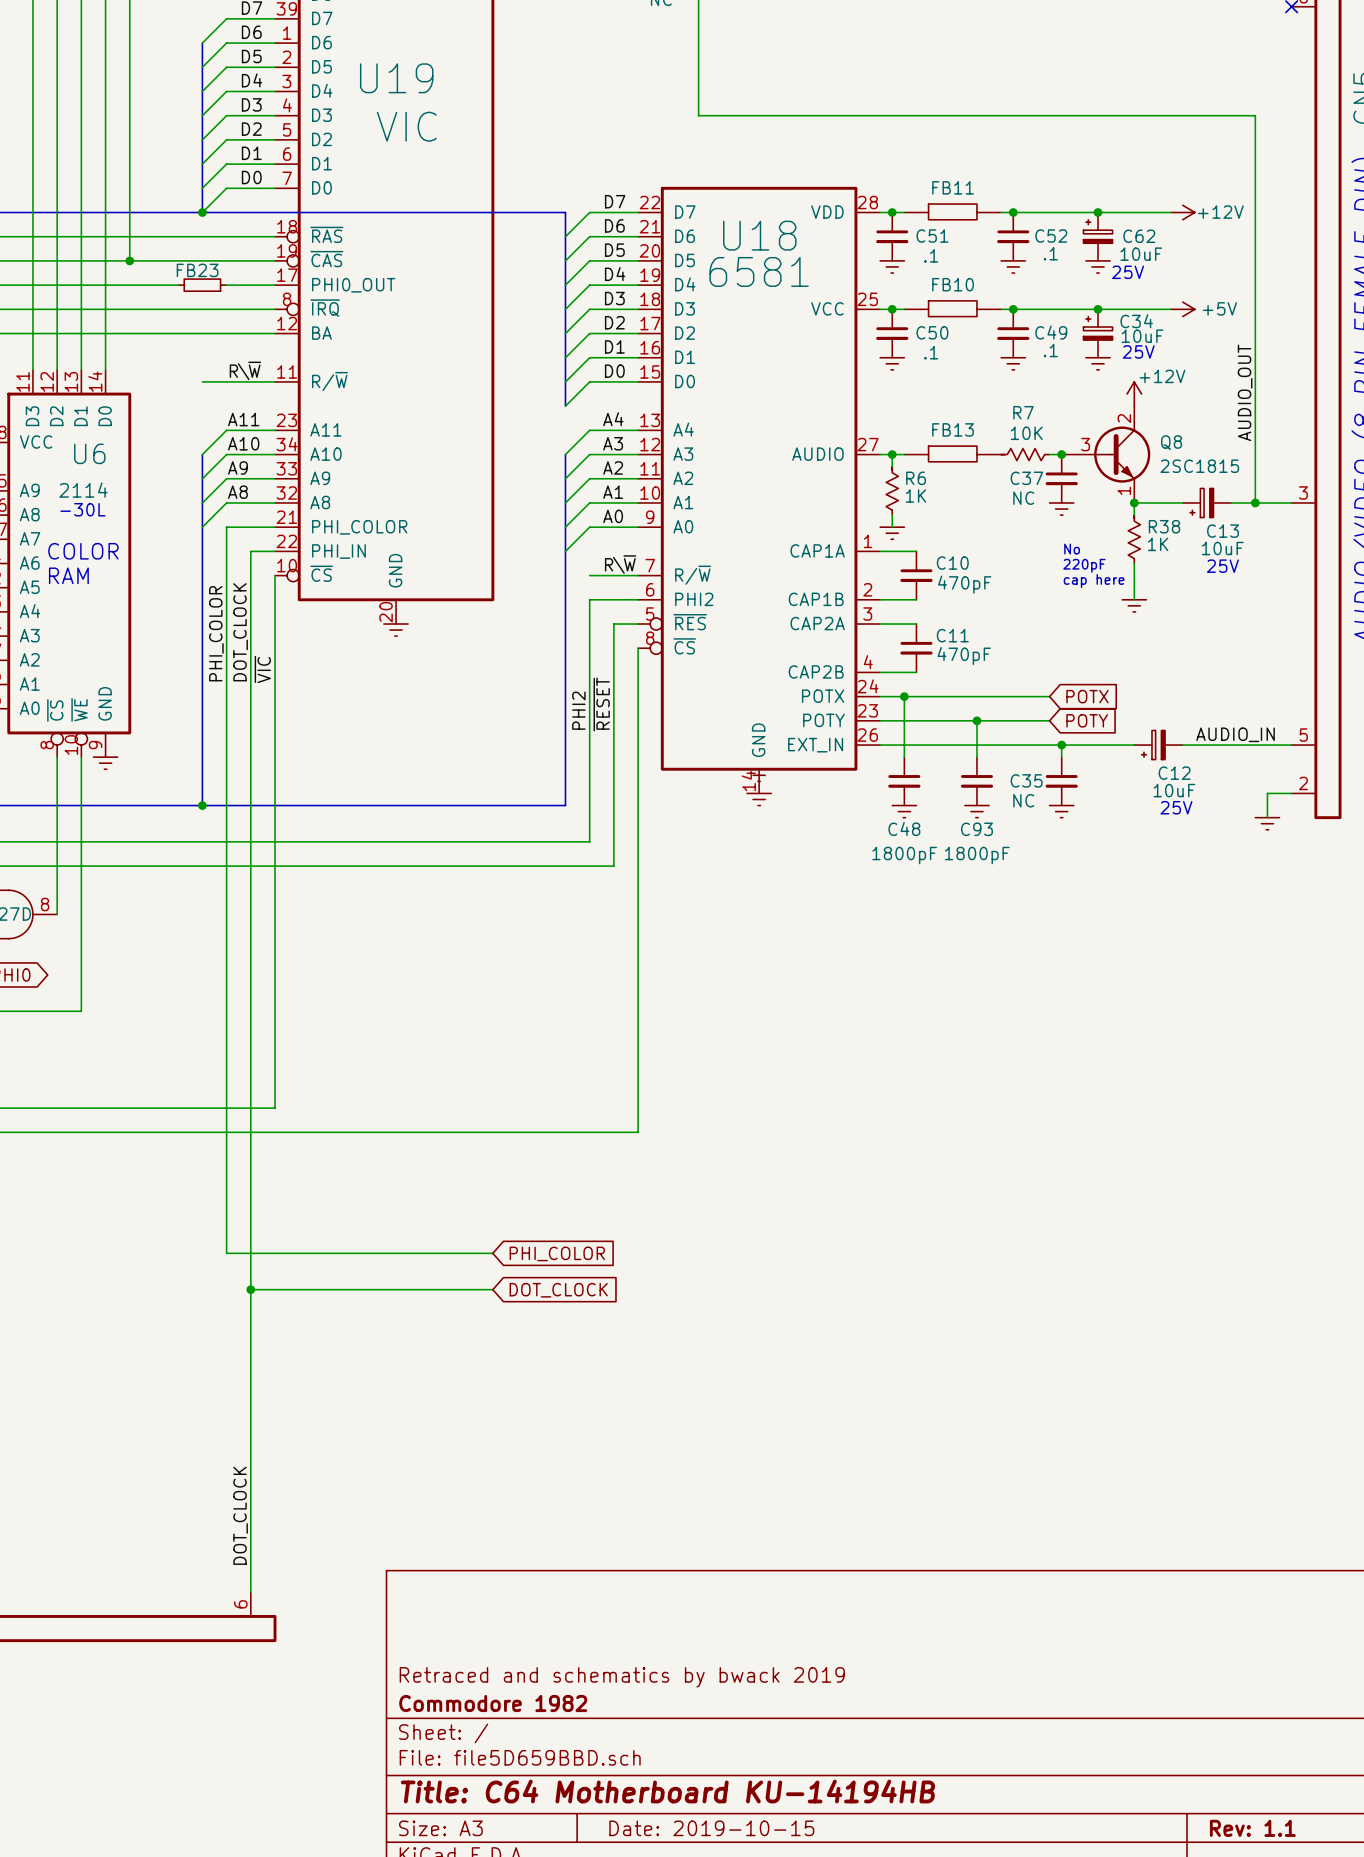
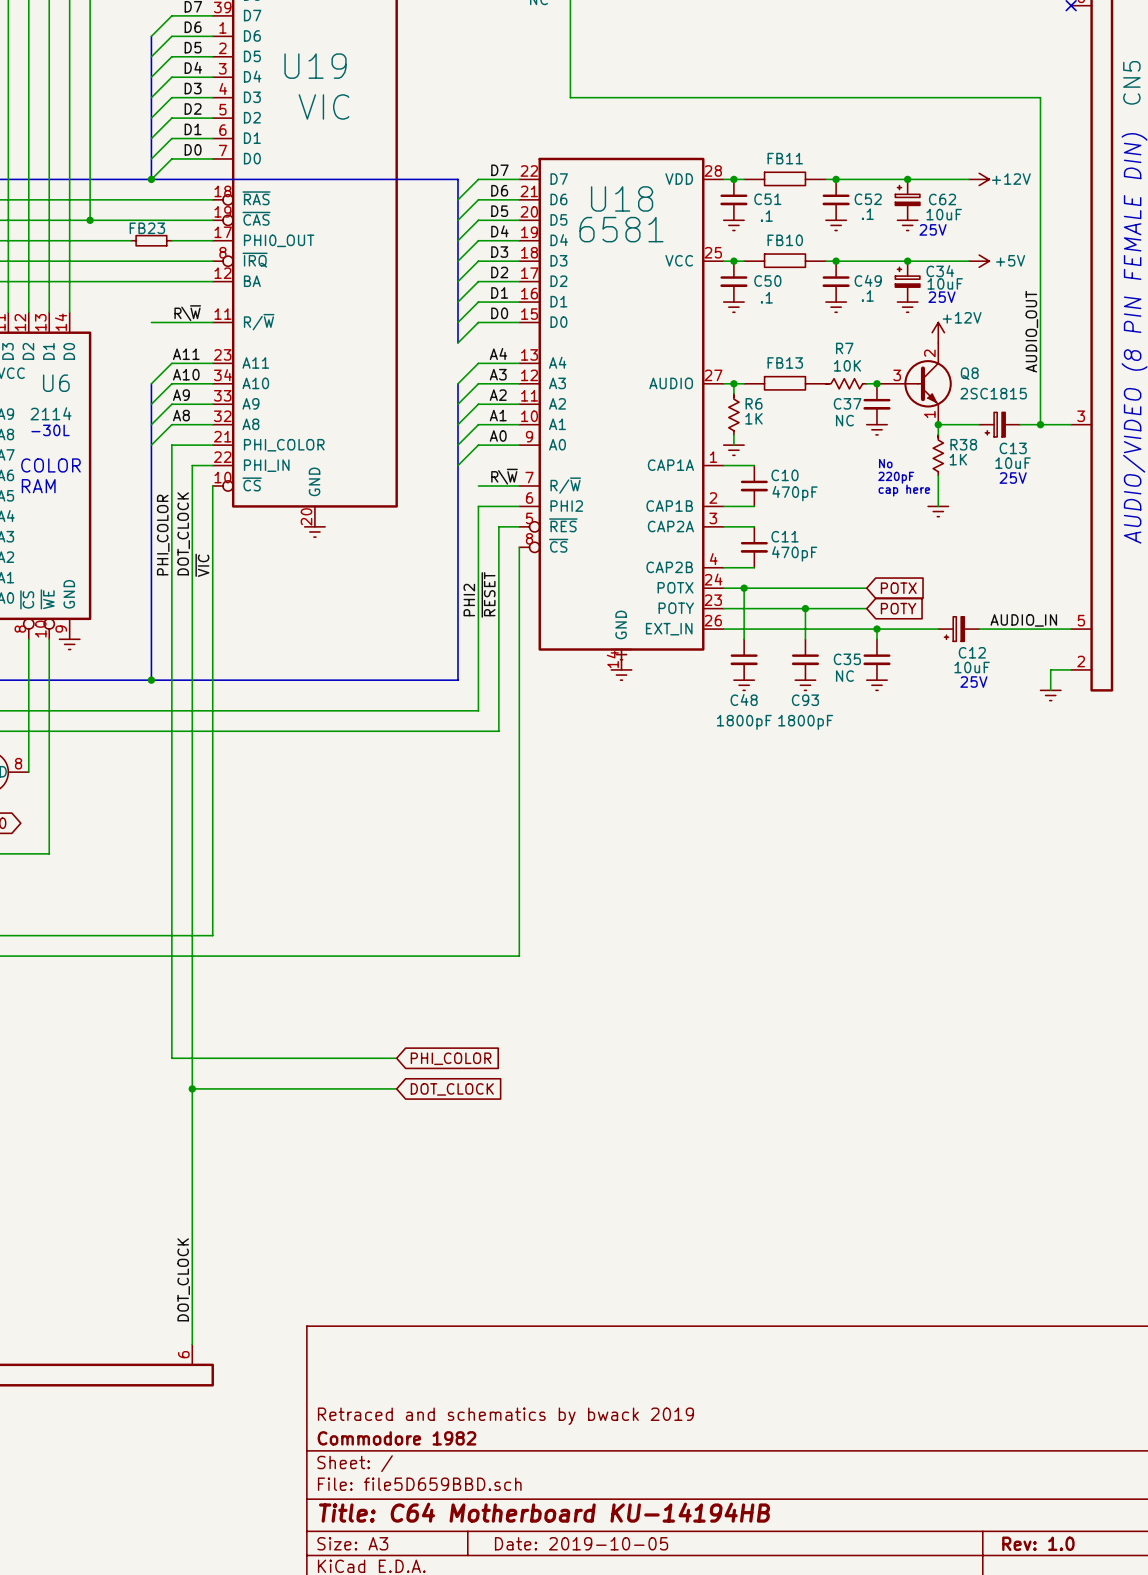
title block: Date: 2019-10-15 (711, 1828) -> Date: 2019-10-05 (581, 1543)
title block: Rev: 1.1 (1252, 1828) -> Rev: 1.0 (1038, 1543)

